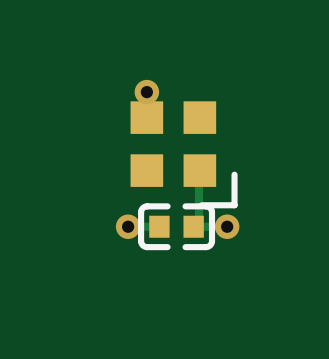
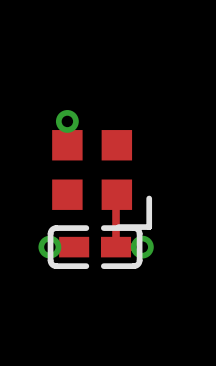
part footprint: [138, 203, 216, 251] -> [47, 225, 143, 270]

